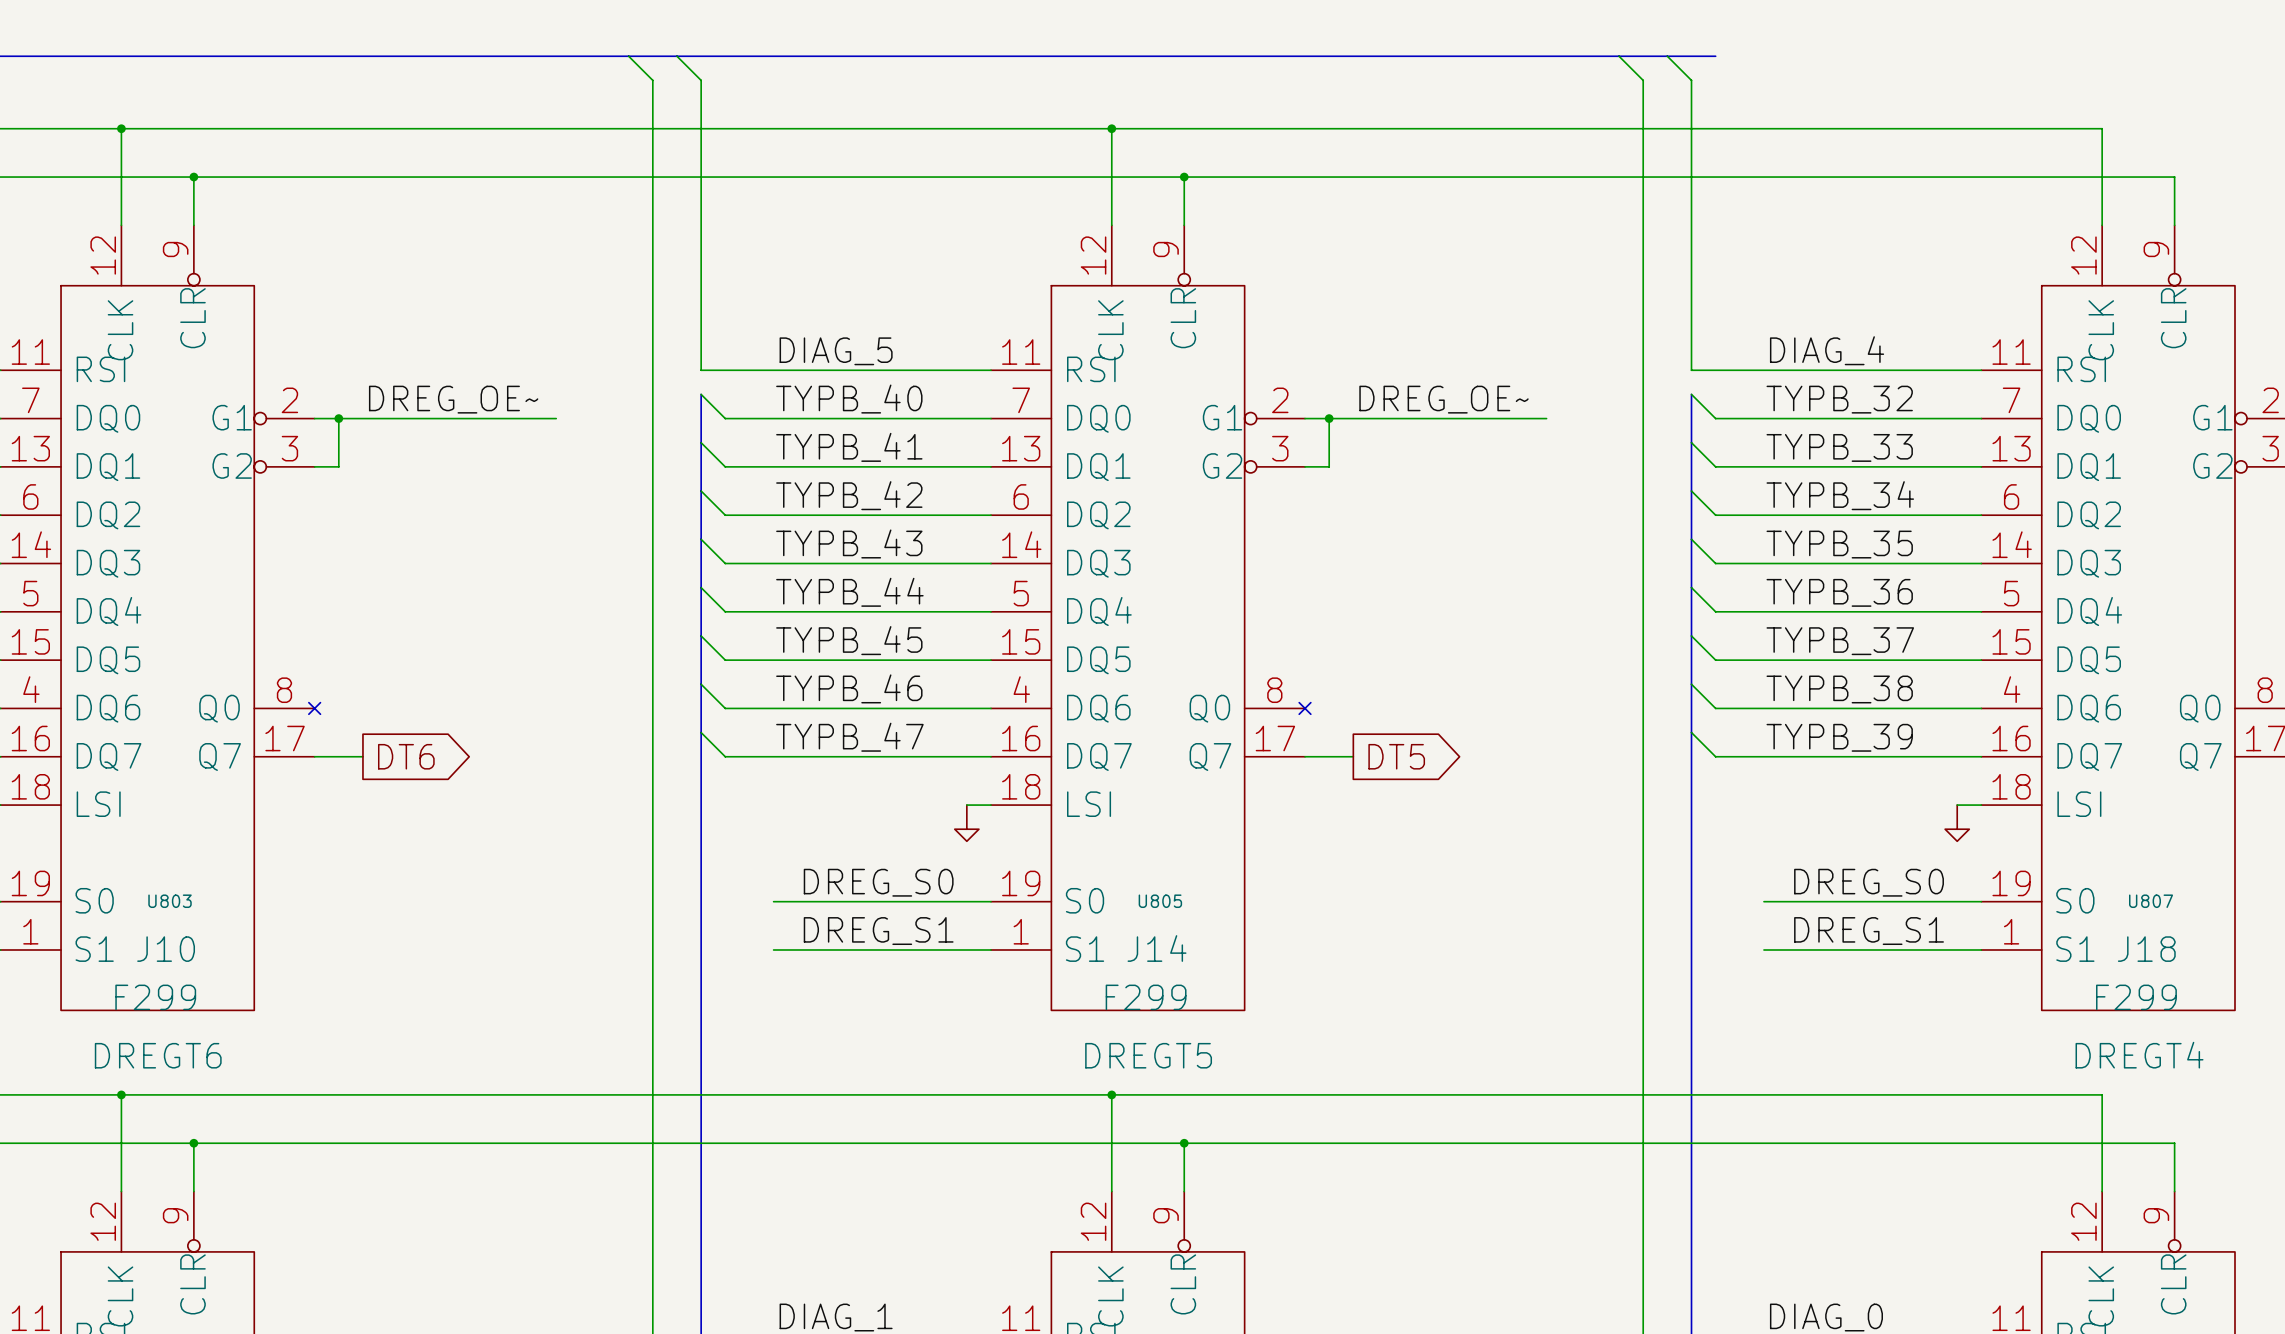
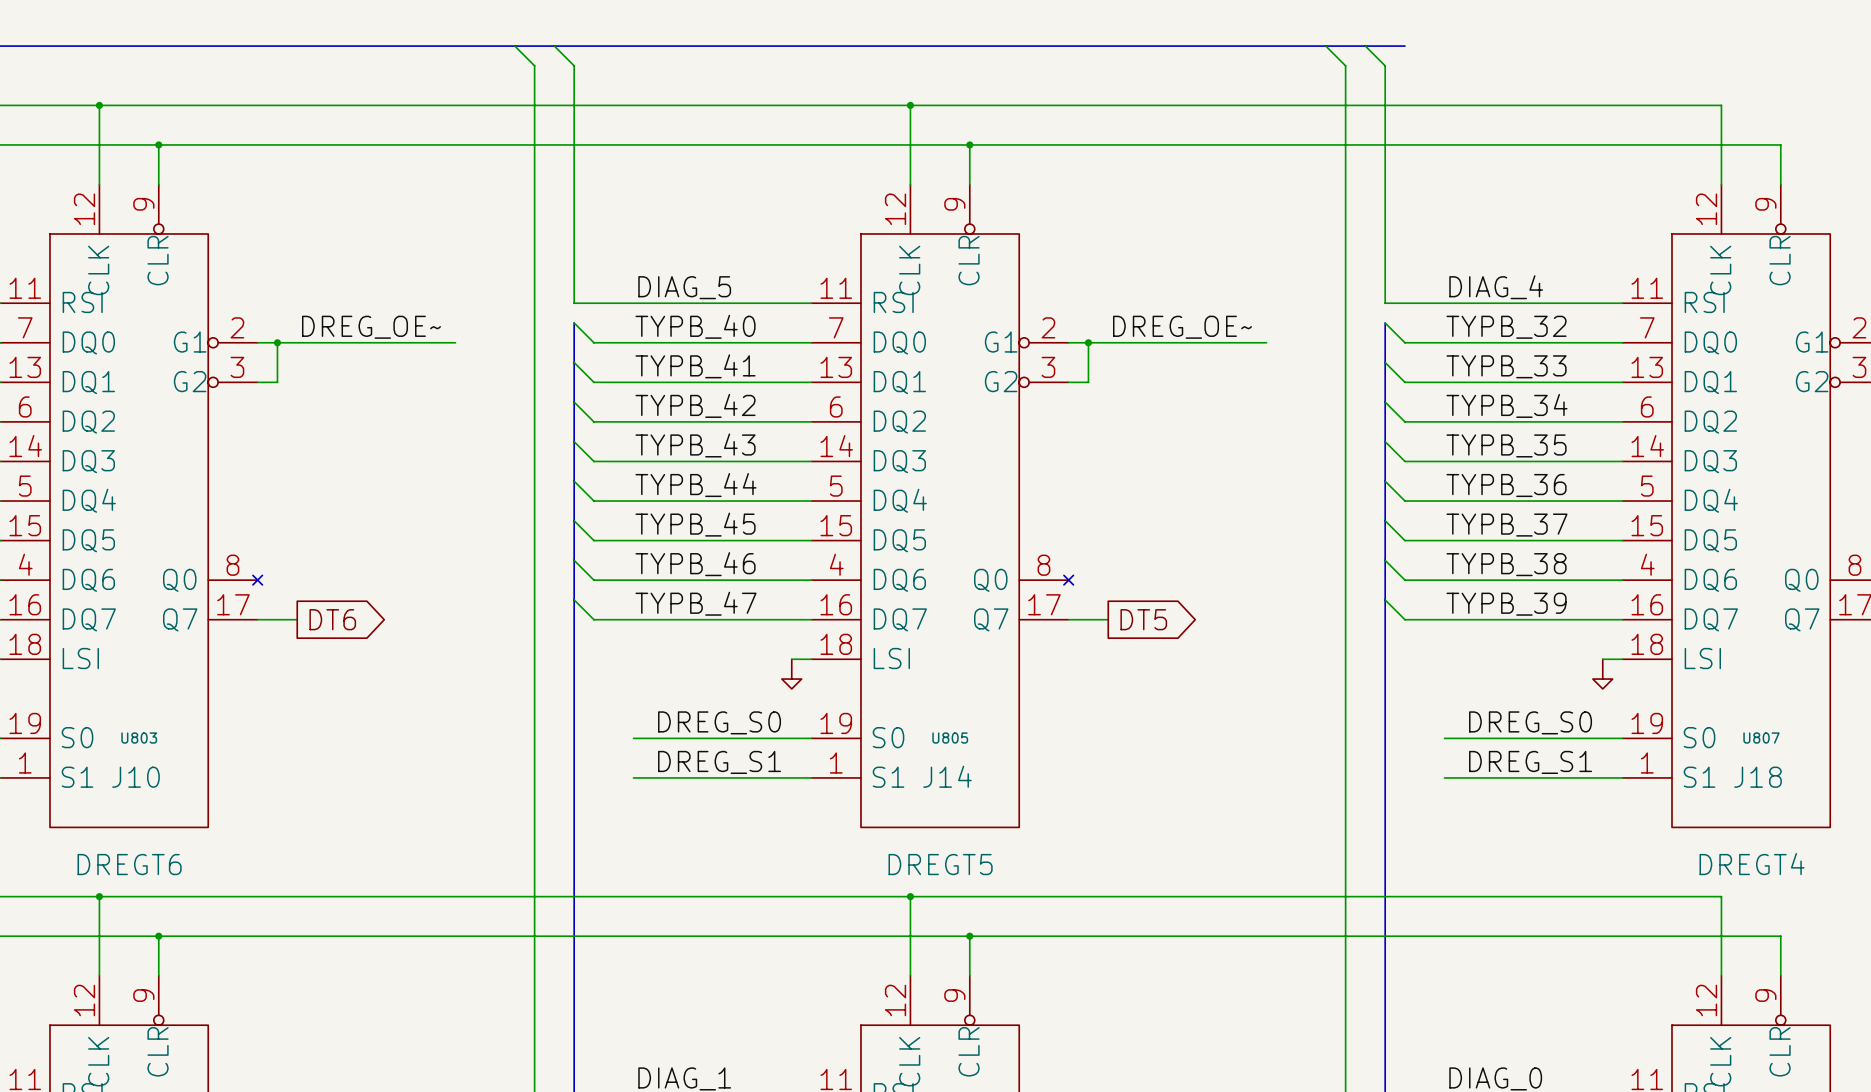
U803 value: F299 (155, 997) -> none
U805 value: F299 (1146, 997) -> none
U807 value: F299 (2136, 997) -> none

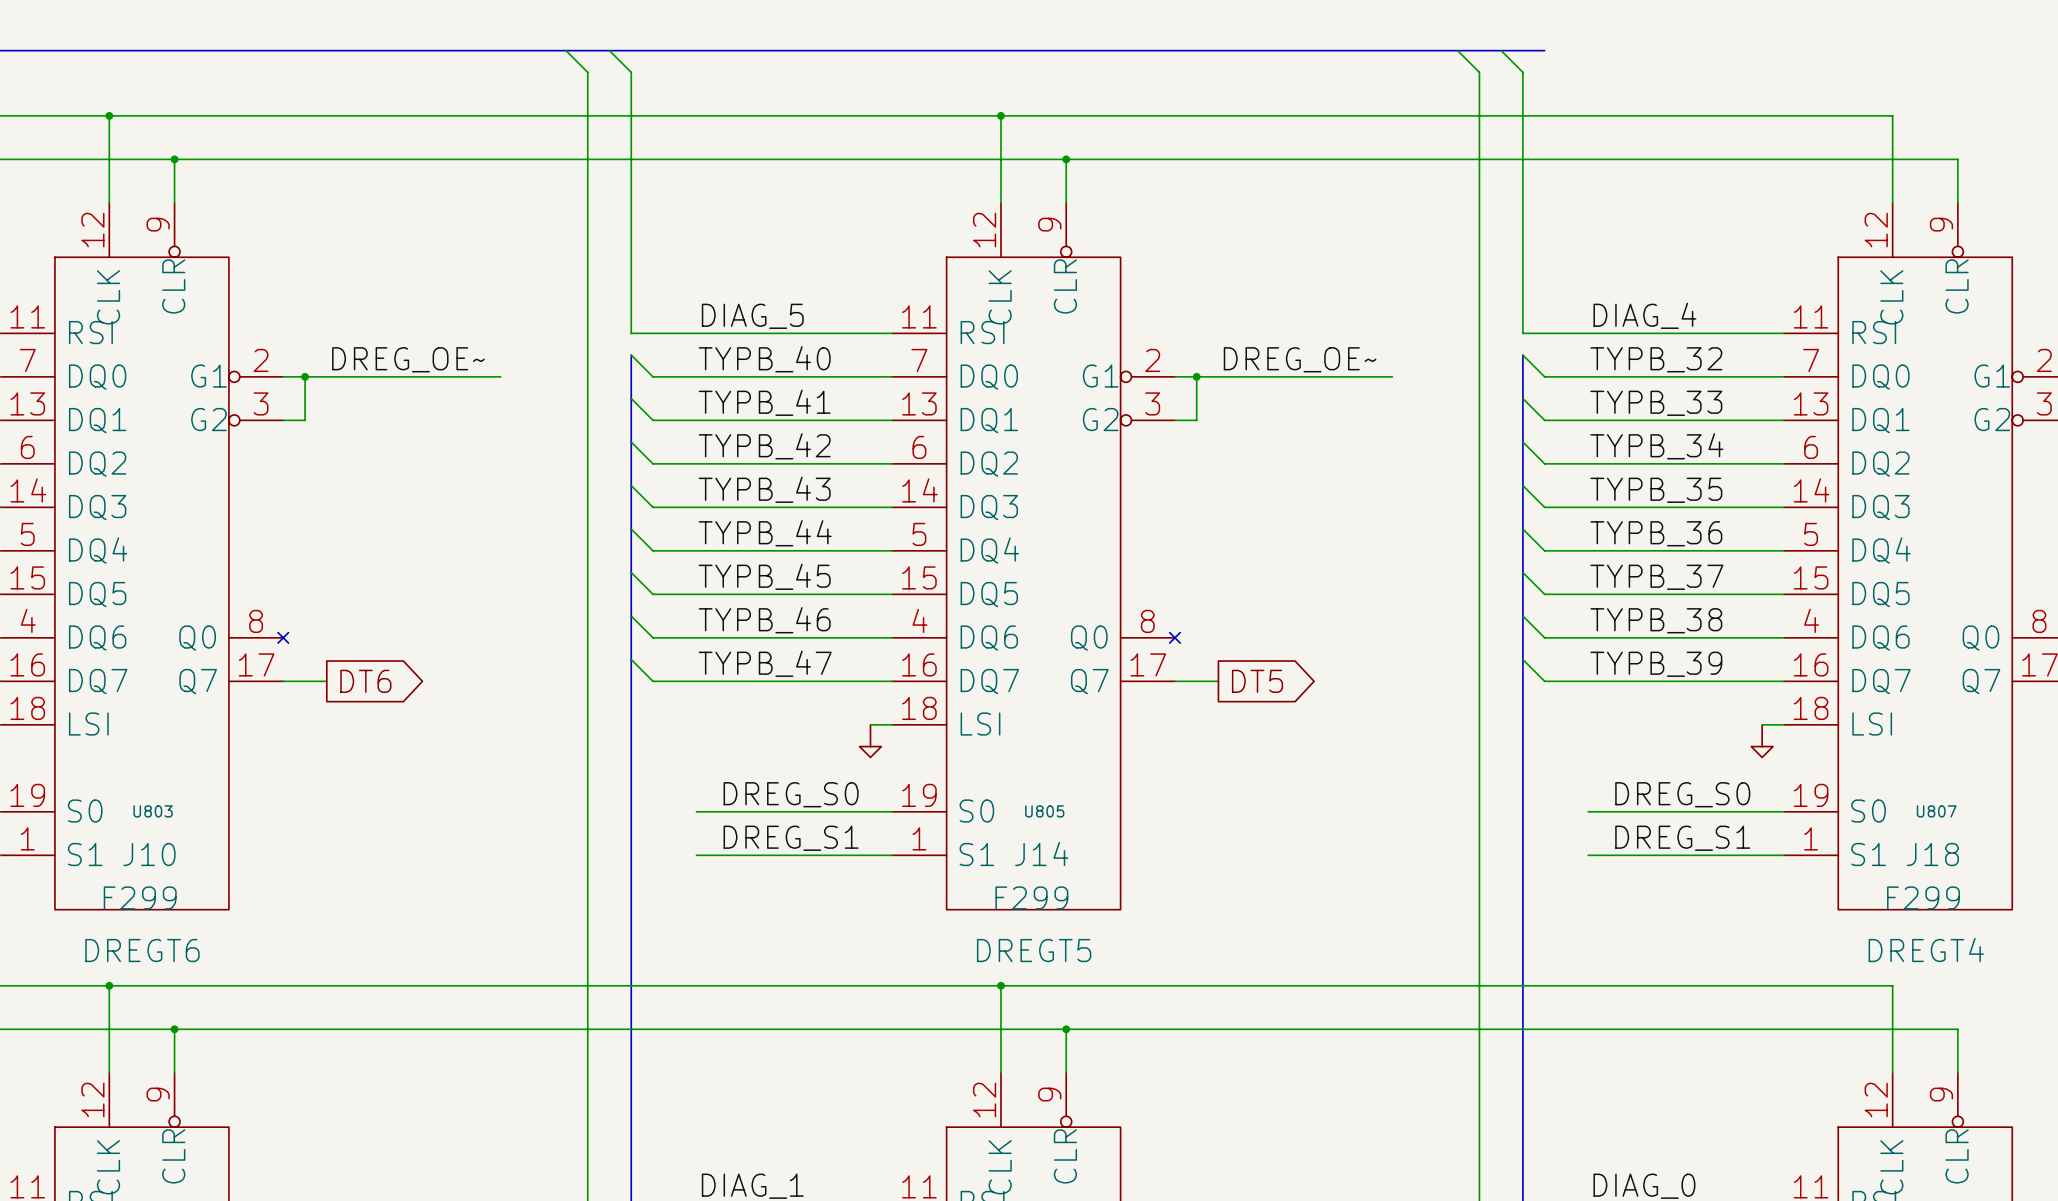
U803 value: none -> F299 (140, 898)
U805 value: none -> F299 (1031, 898)
U807 value: none -> F299 (1923, 898)

